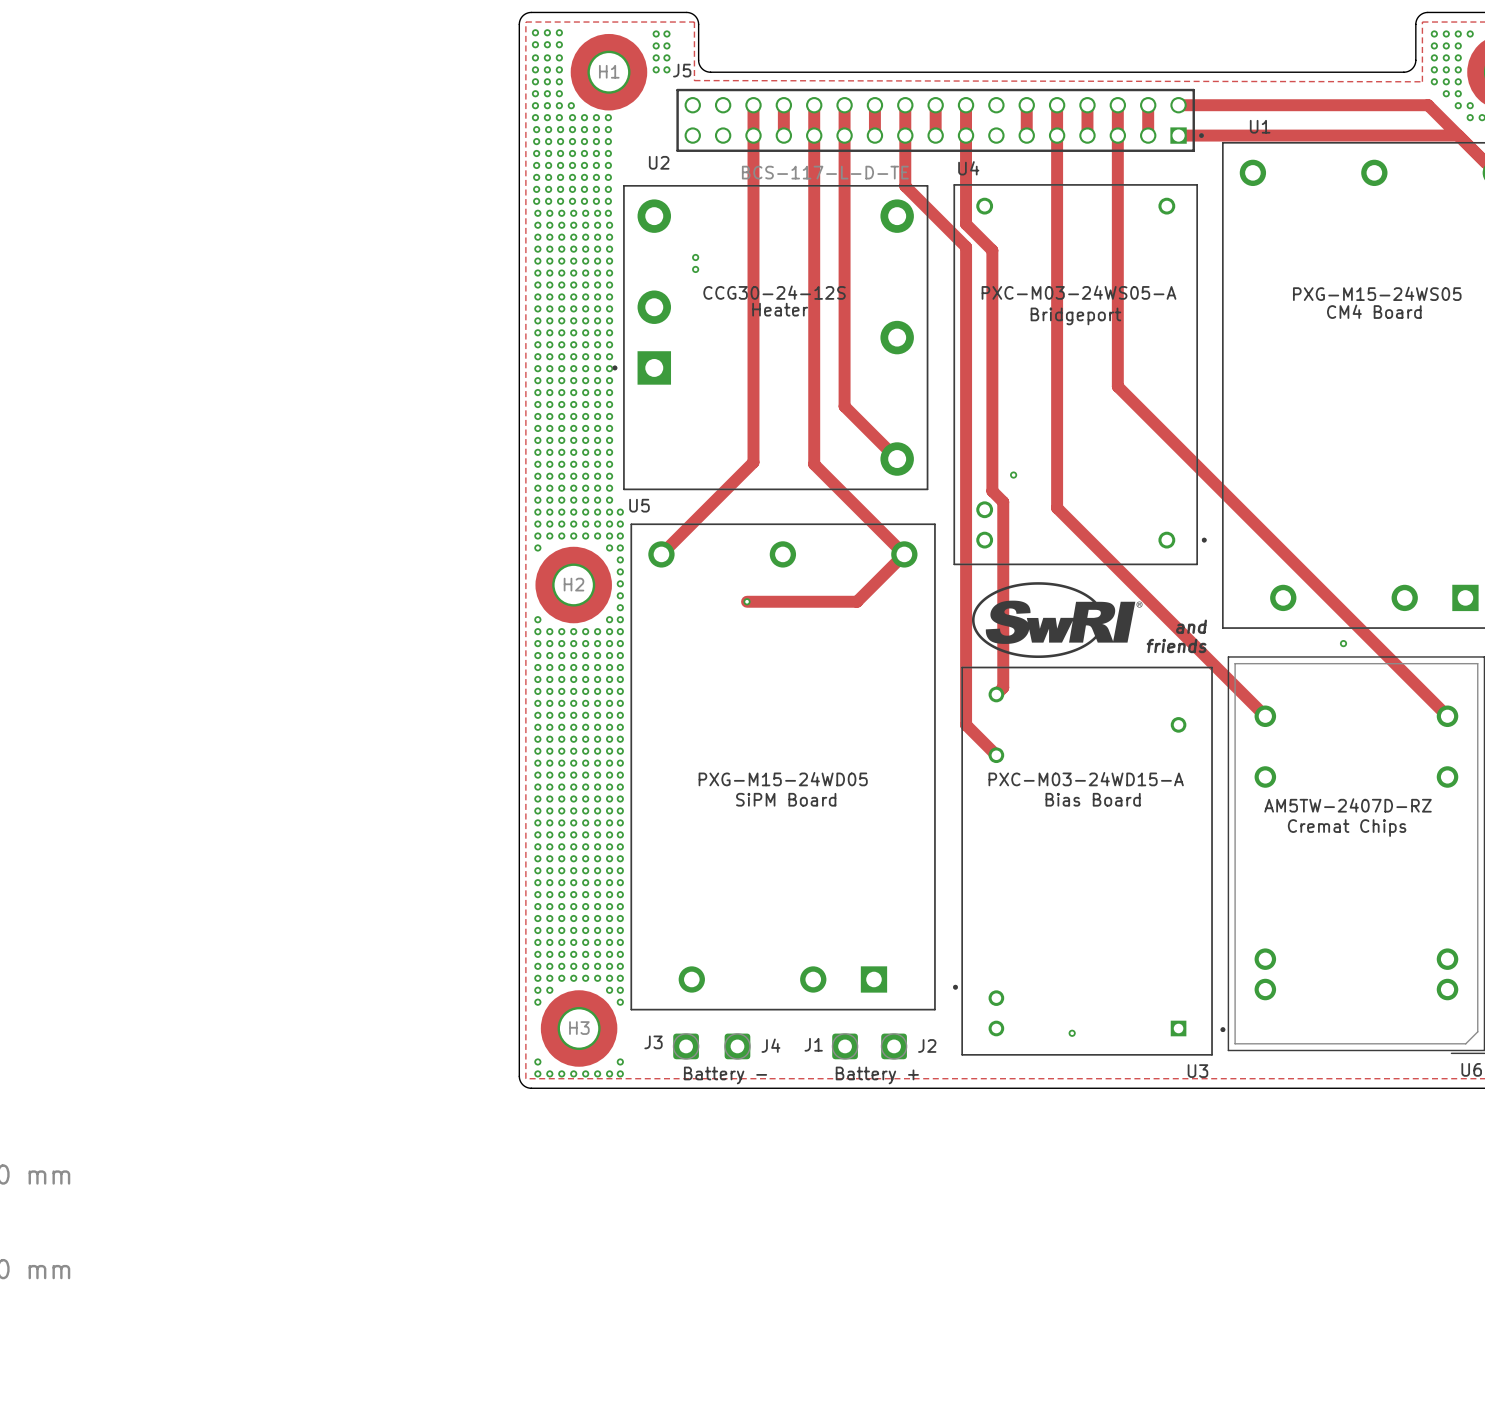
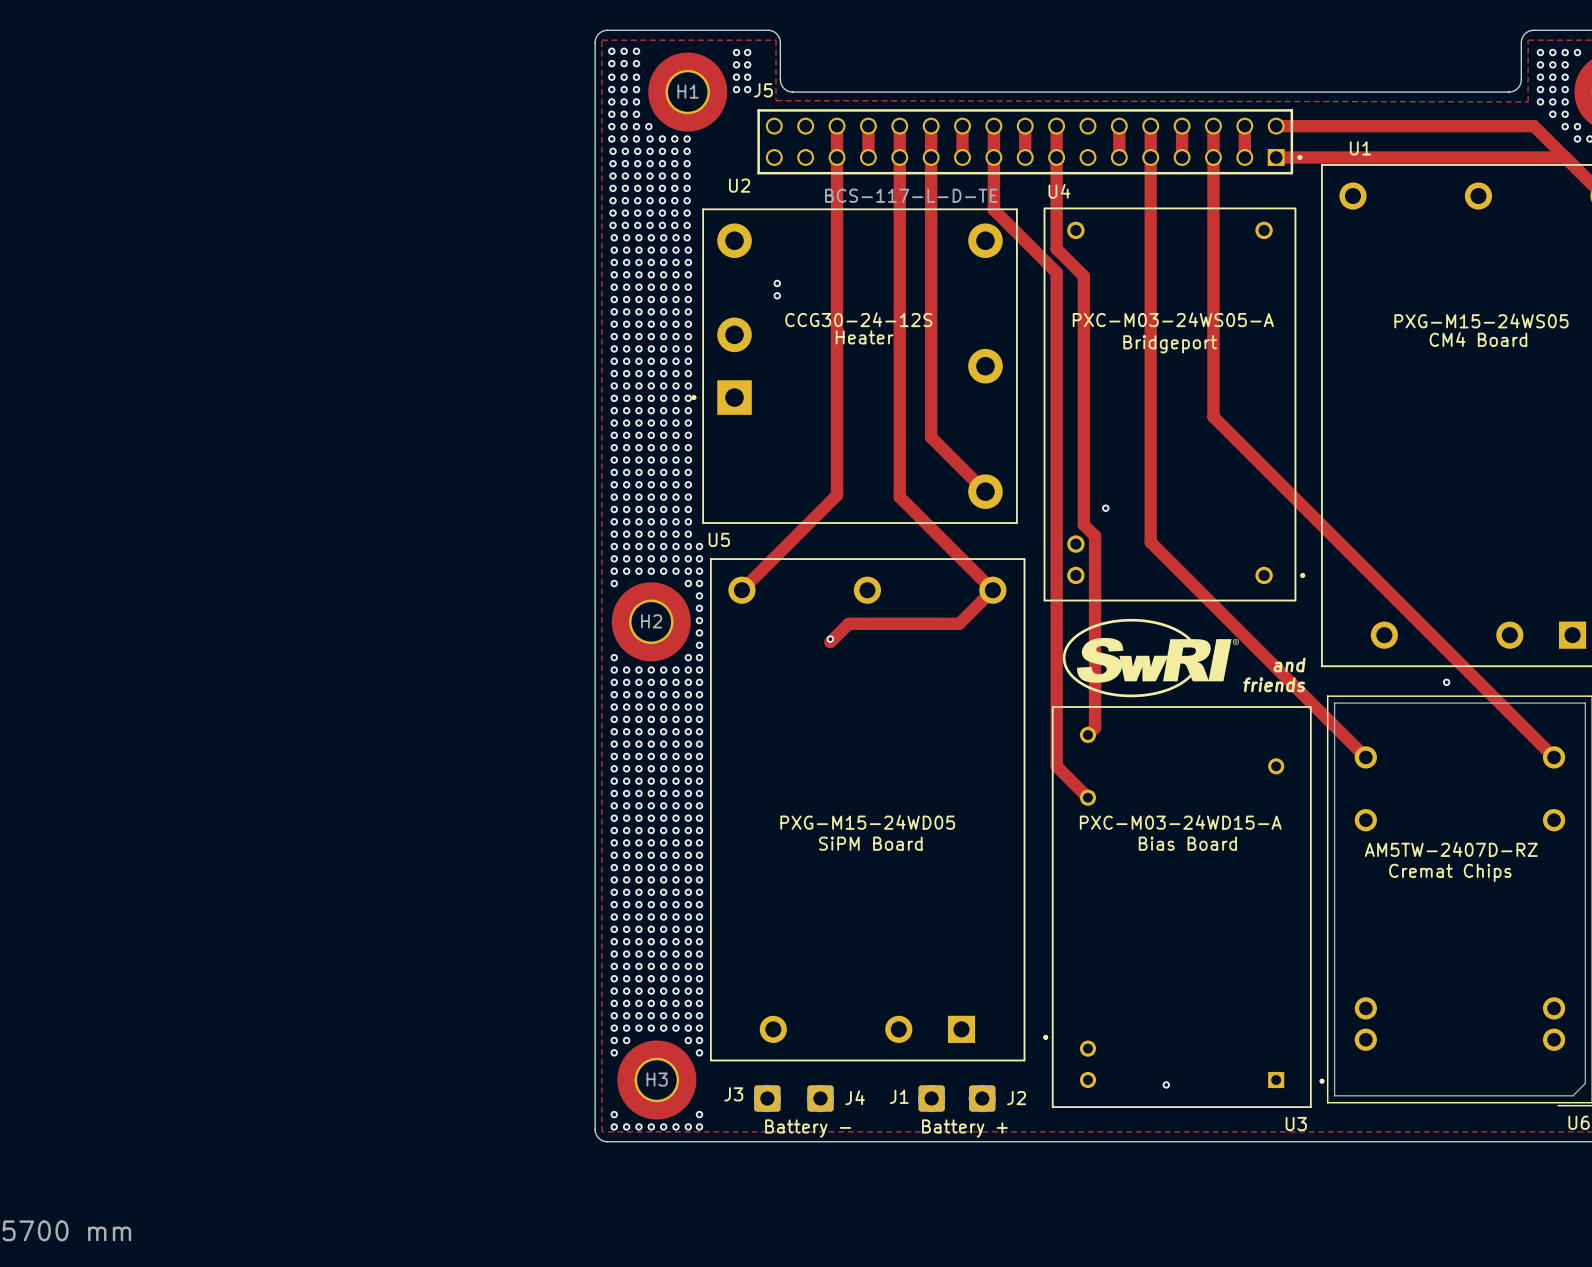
track: (871, 586) (857, 601) (747, 601) -> (959, 623) (848, 623) (830, 642)

